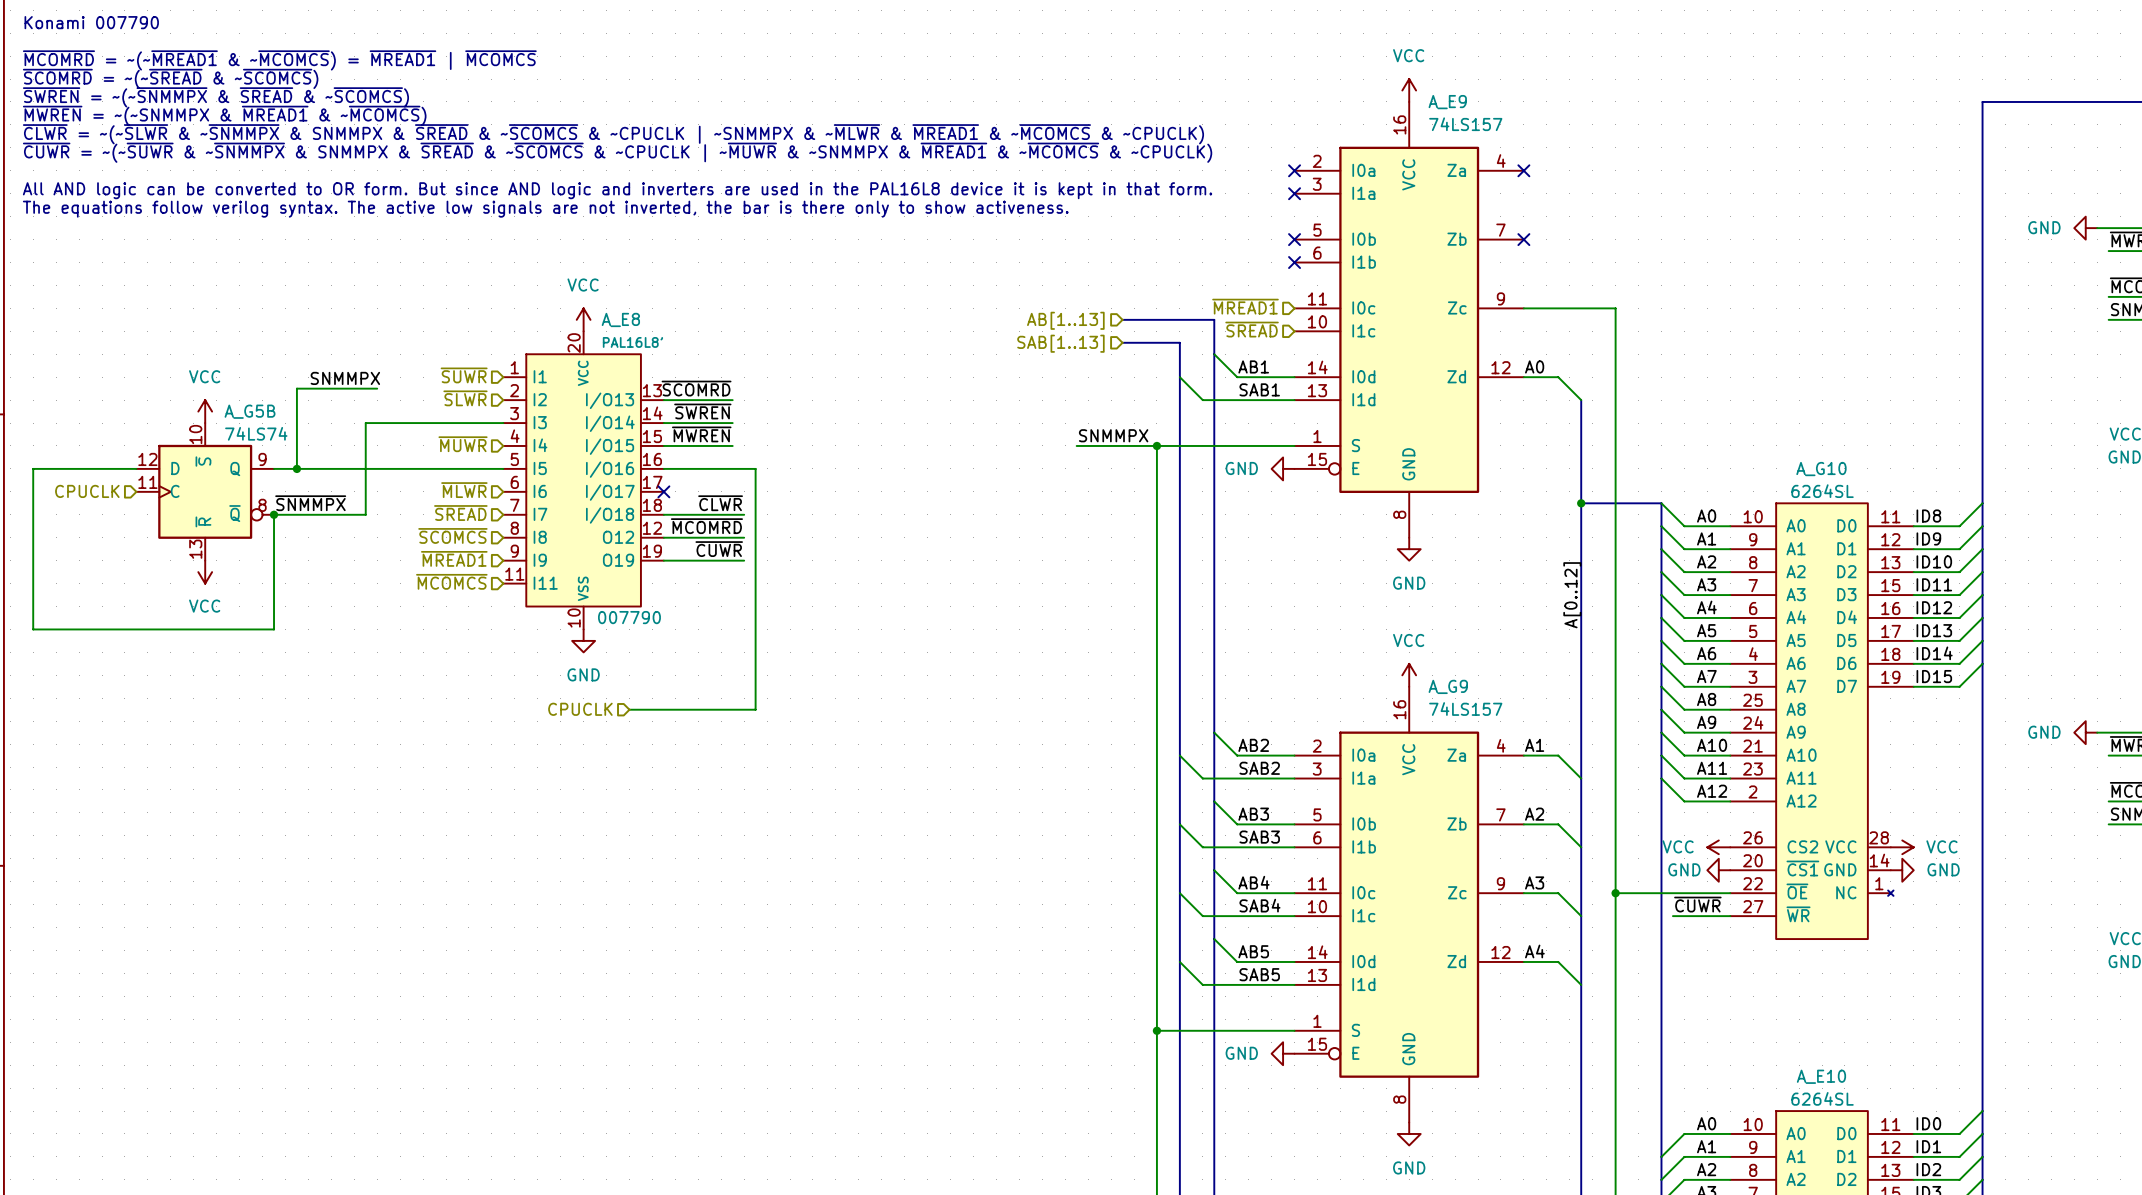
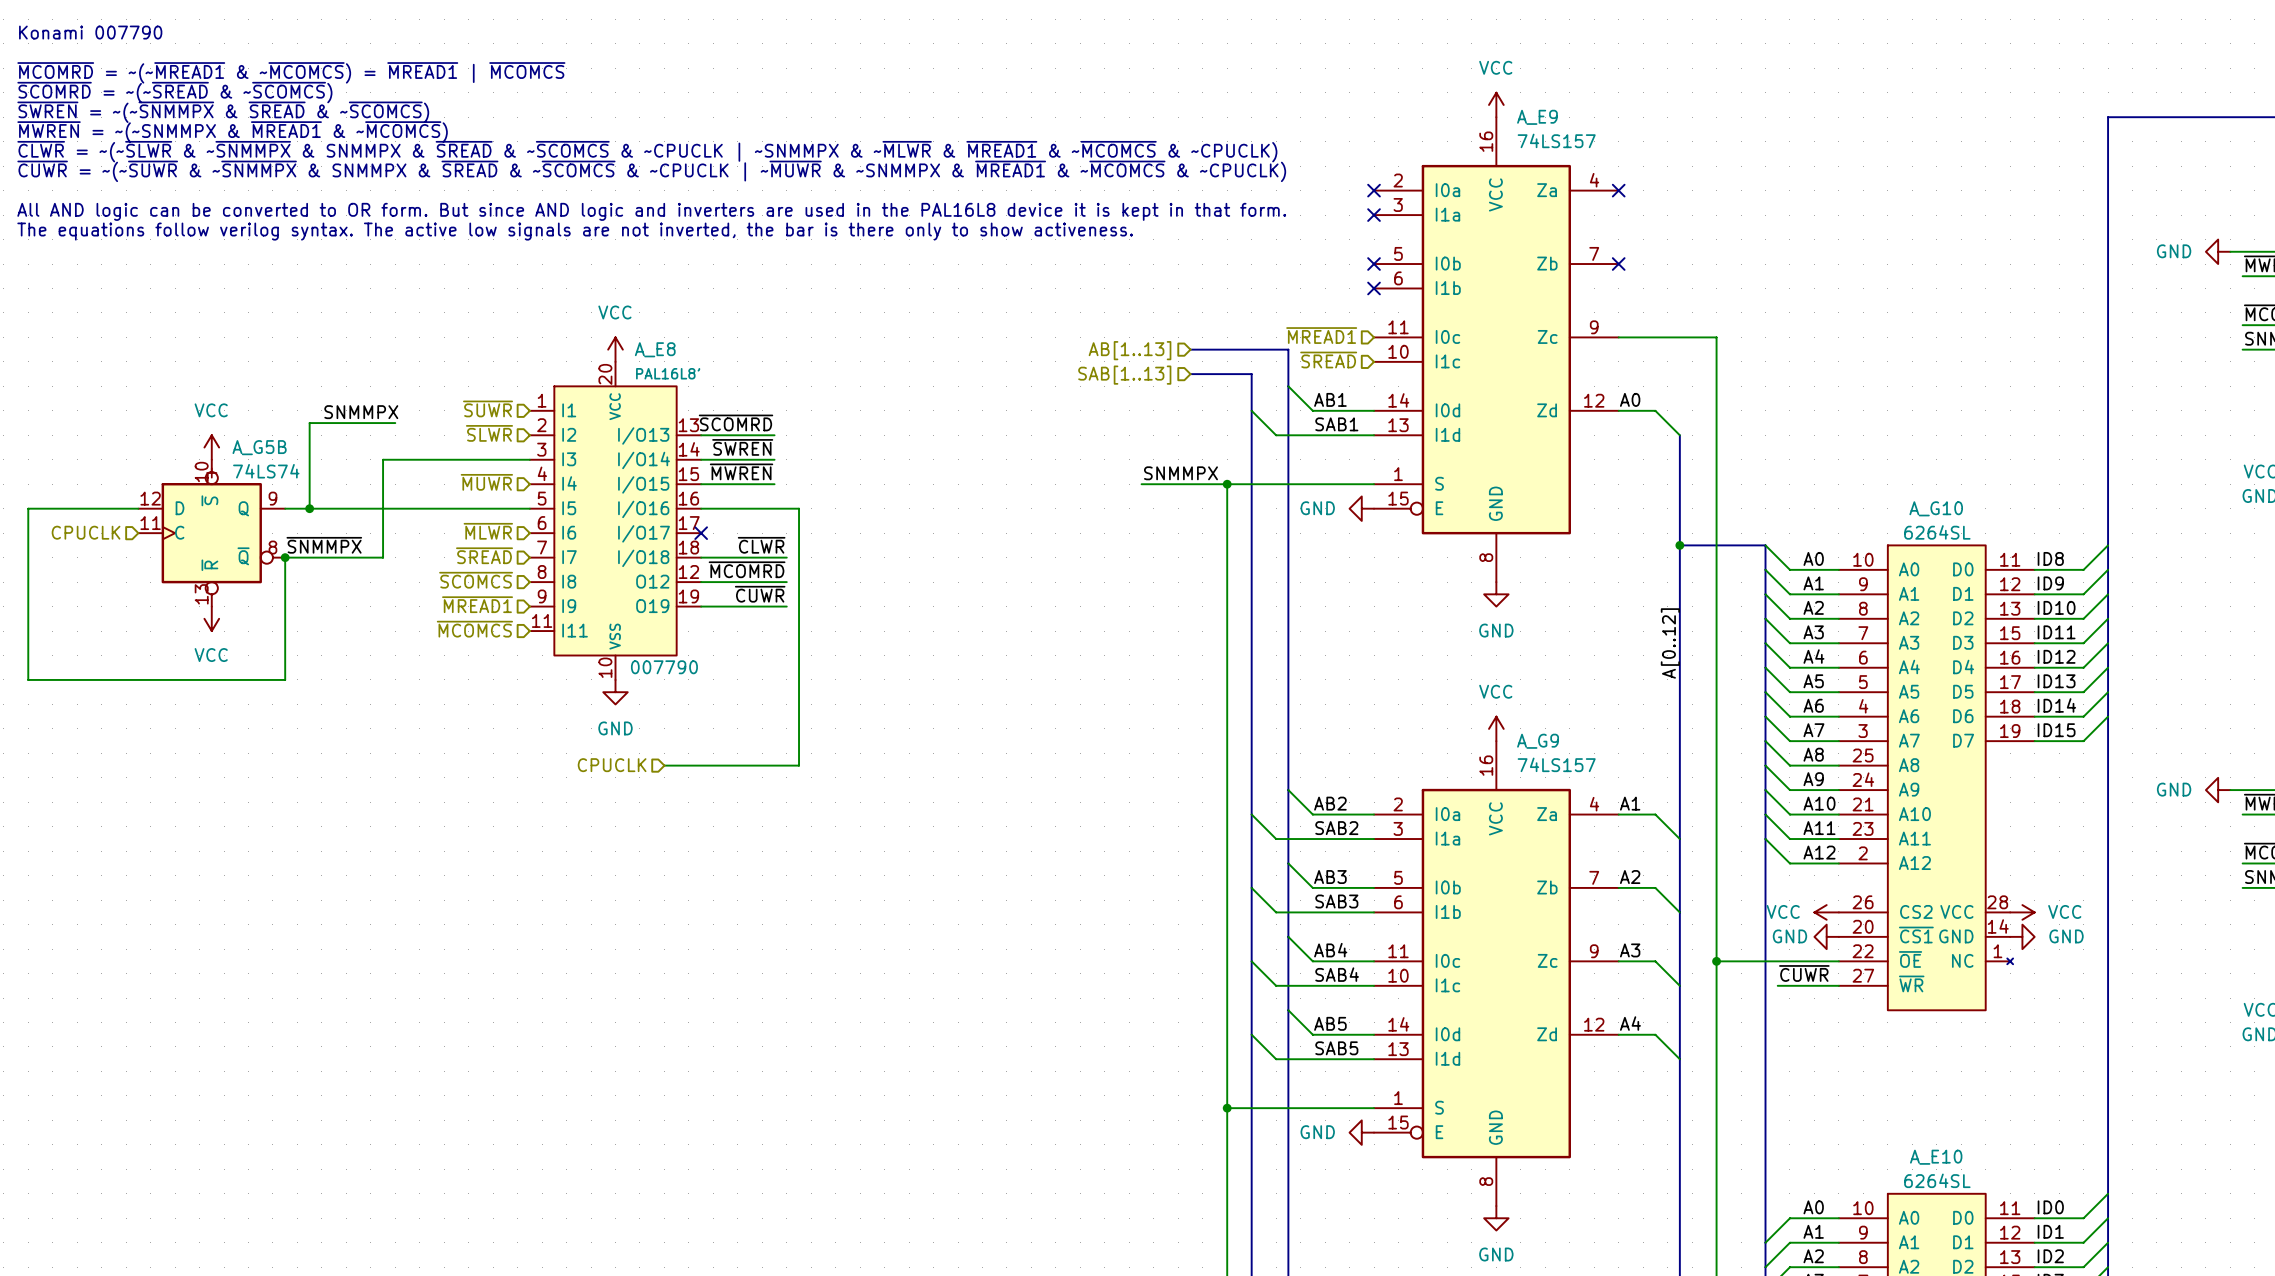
A_G5B symbol: [136, 423, 275, 561] -> [138, 459, 286, 607]

